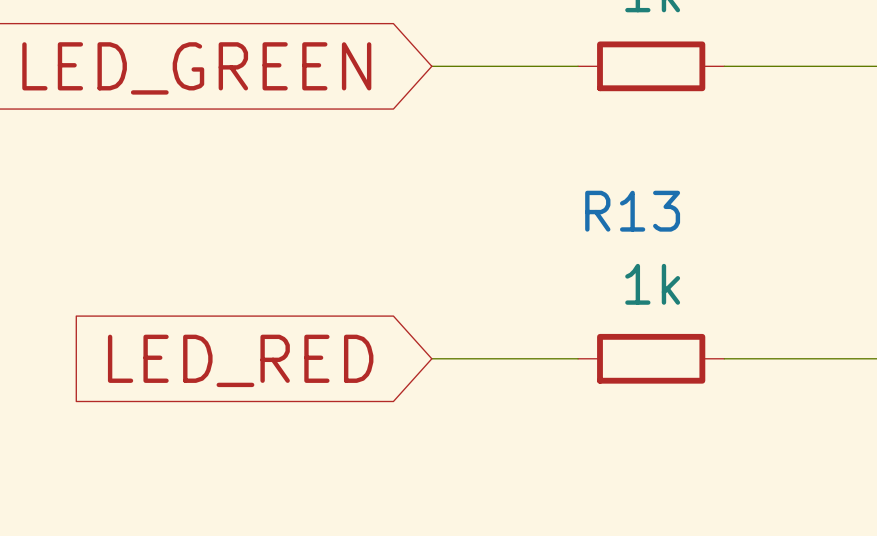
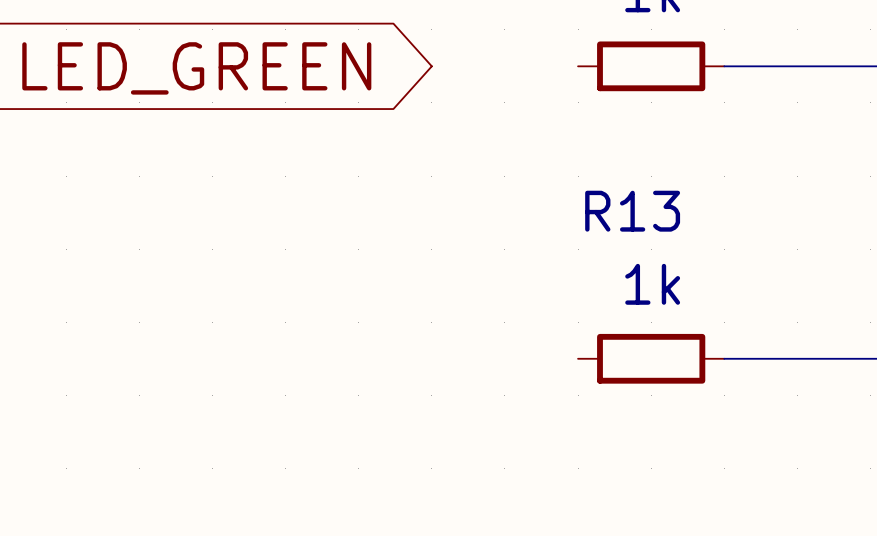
wire: (431, 66) (578, 66) -> none
wire: (431, 358) (578, 358) -> none
global label: LED_RED (240, 360) -> none

